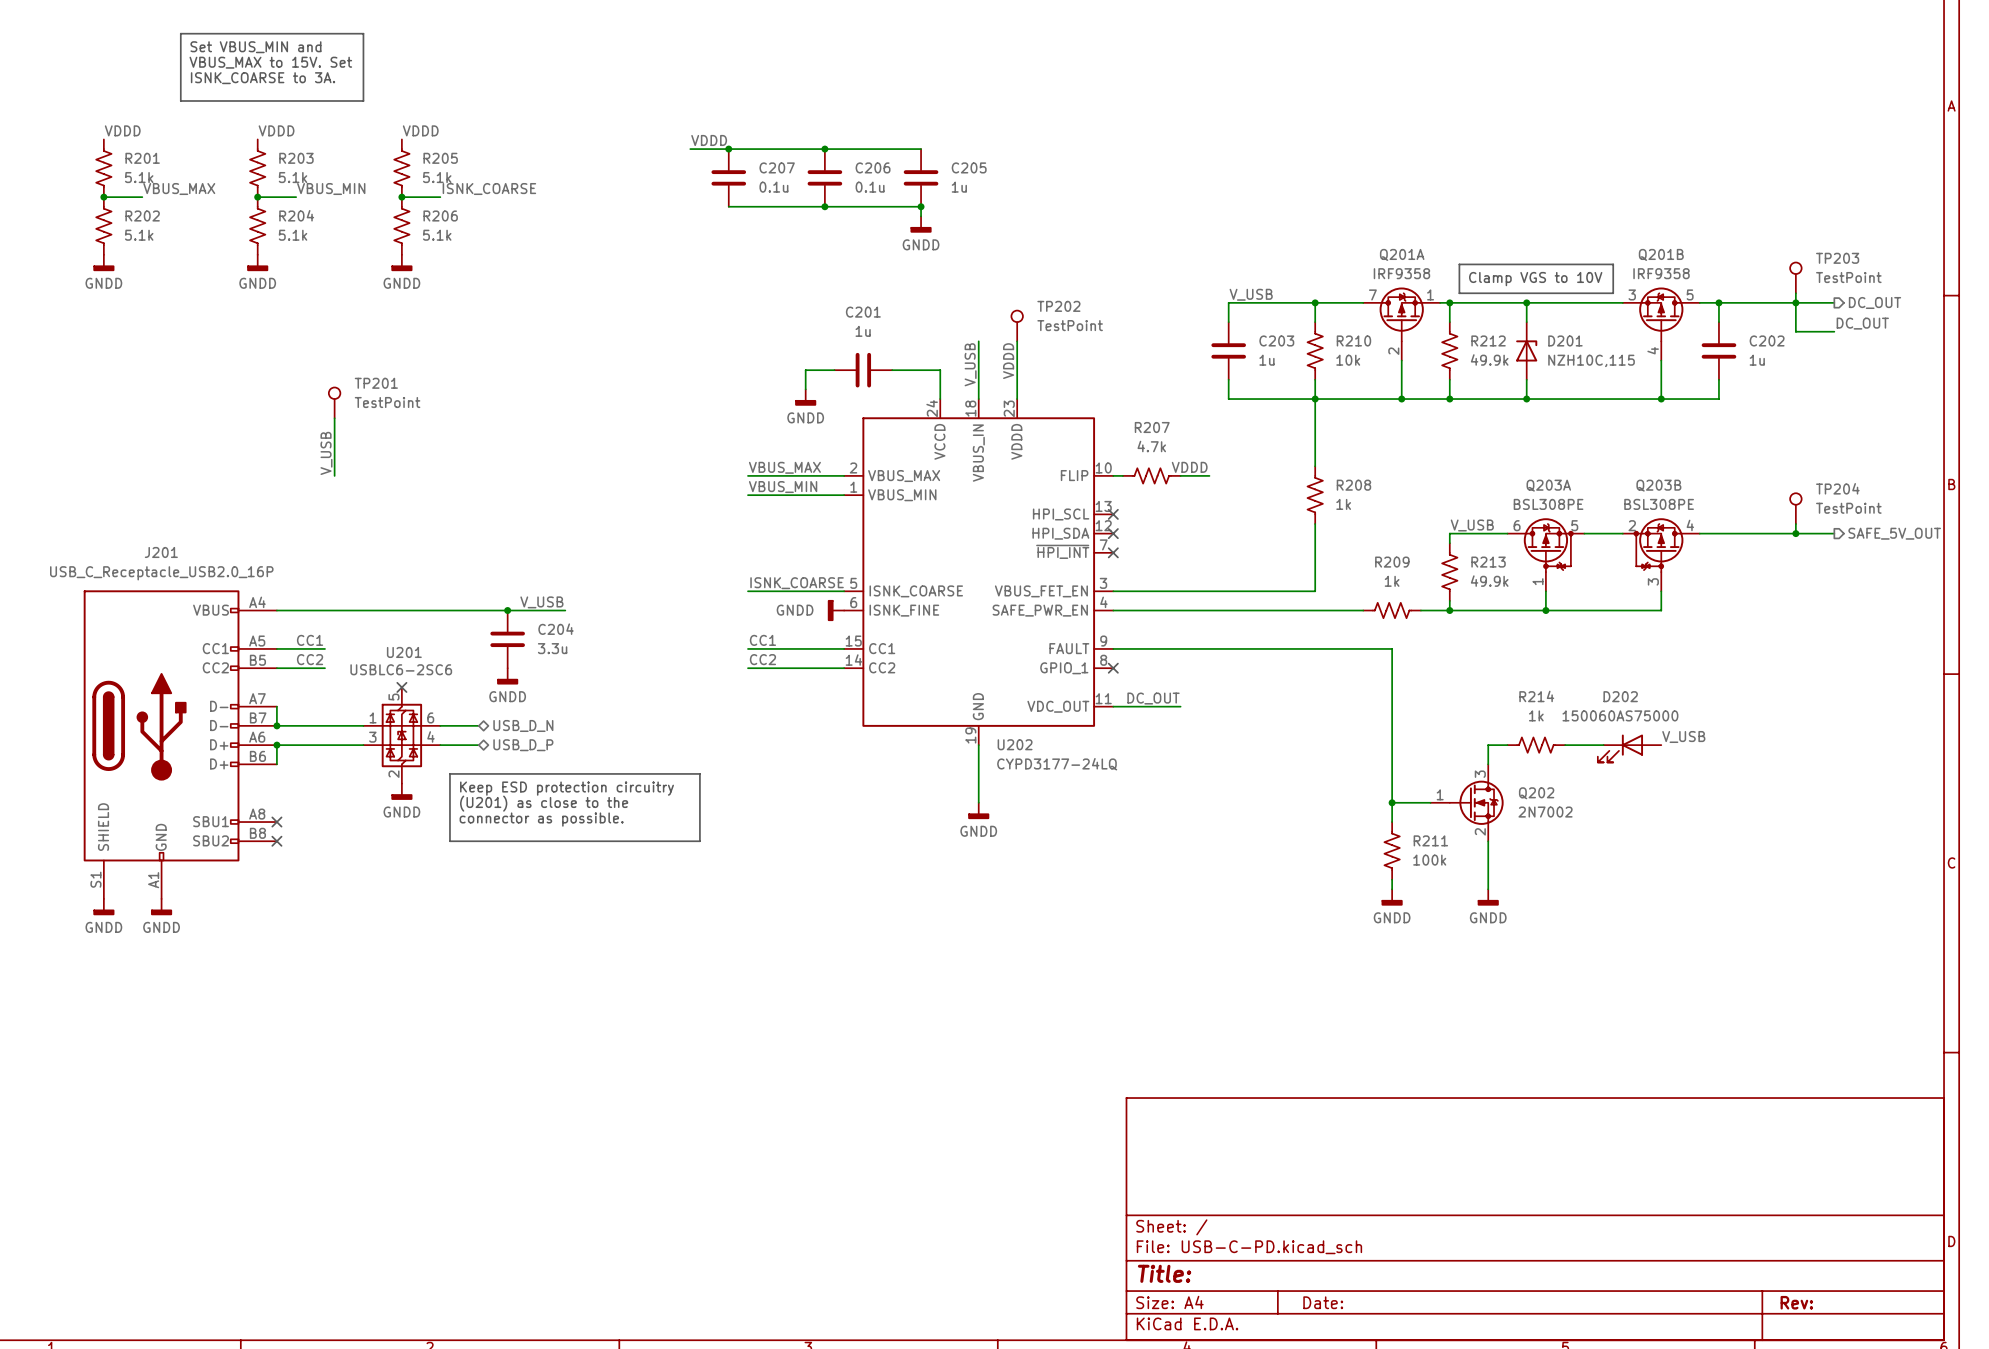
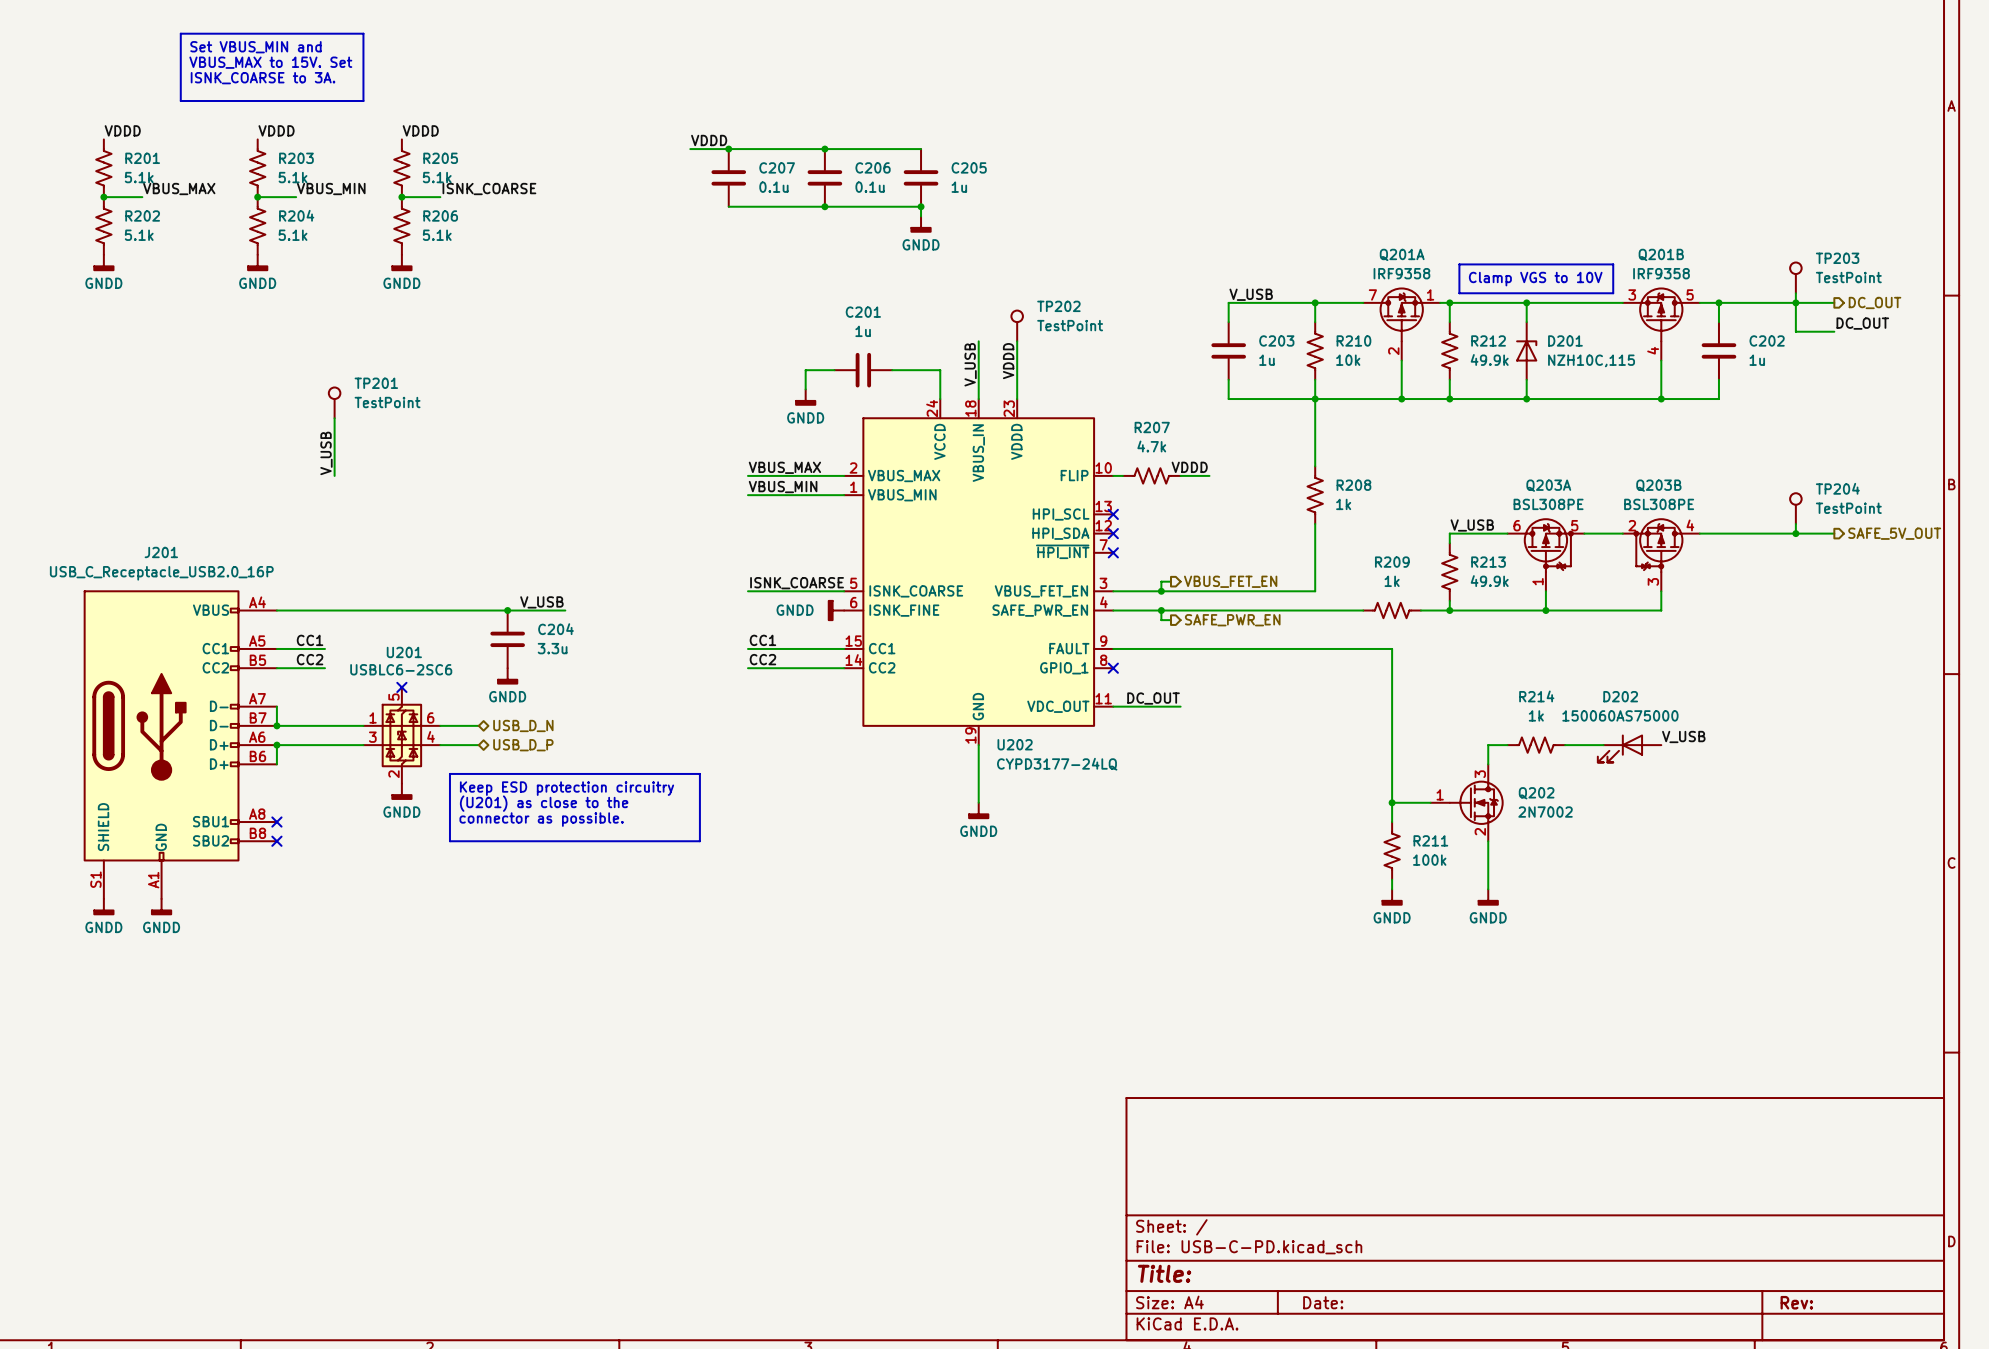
wire: none -> (1170, 581) (1161, 581) (1161, 591)
hierarchical label: none -> VBUS_FET_EN (1230, 581)
junction: none -> (1161, 591)
wire: none -> (1161, 610) (1161, 620) (1170, 620)
junction: none -> (1161, 610)
hierarchical label: none -> SAFE_PWR_EN (1232, 620)

